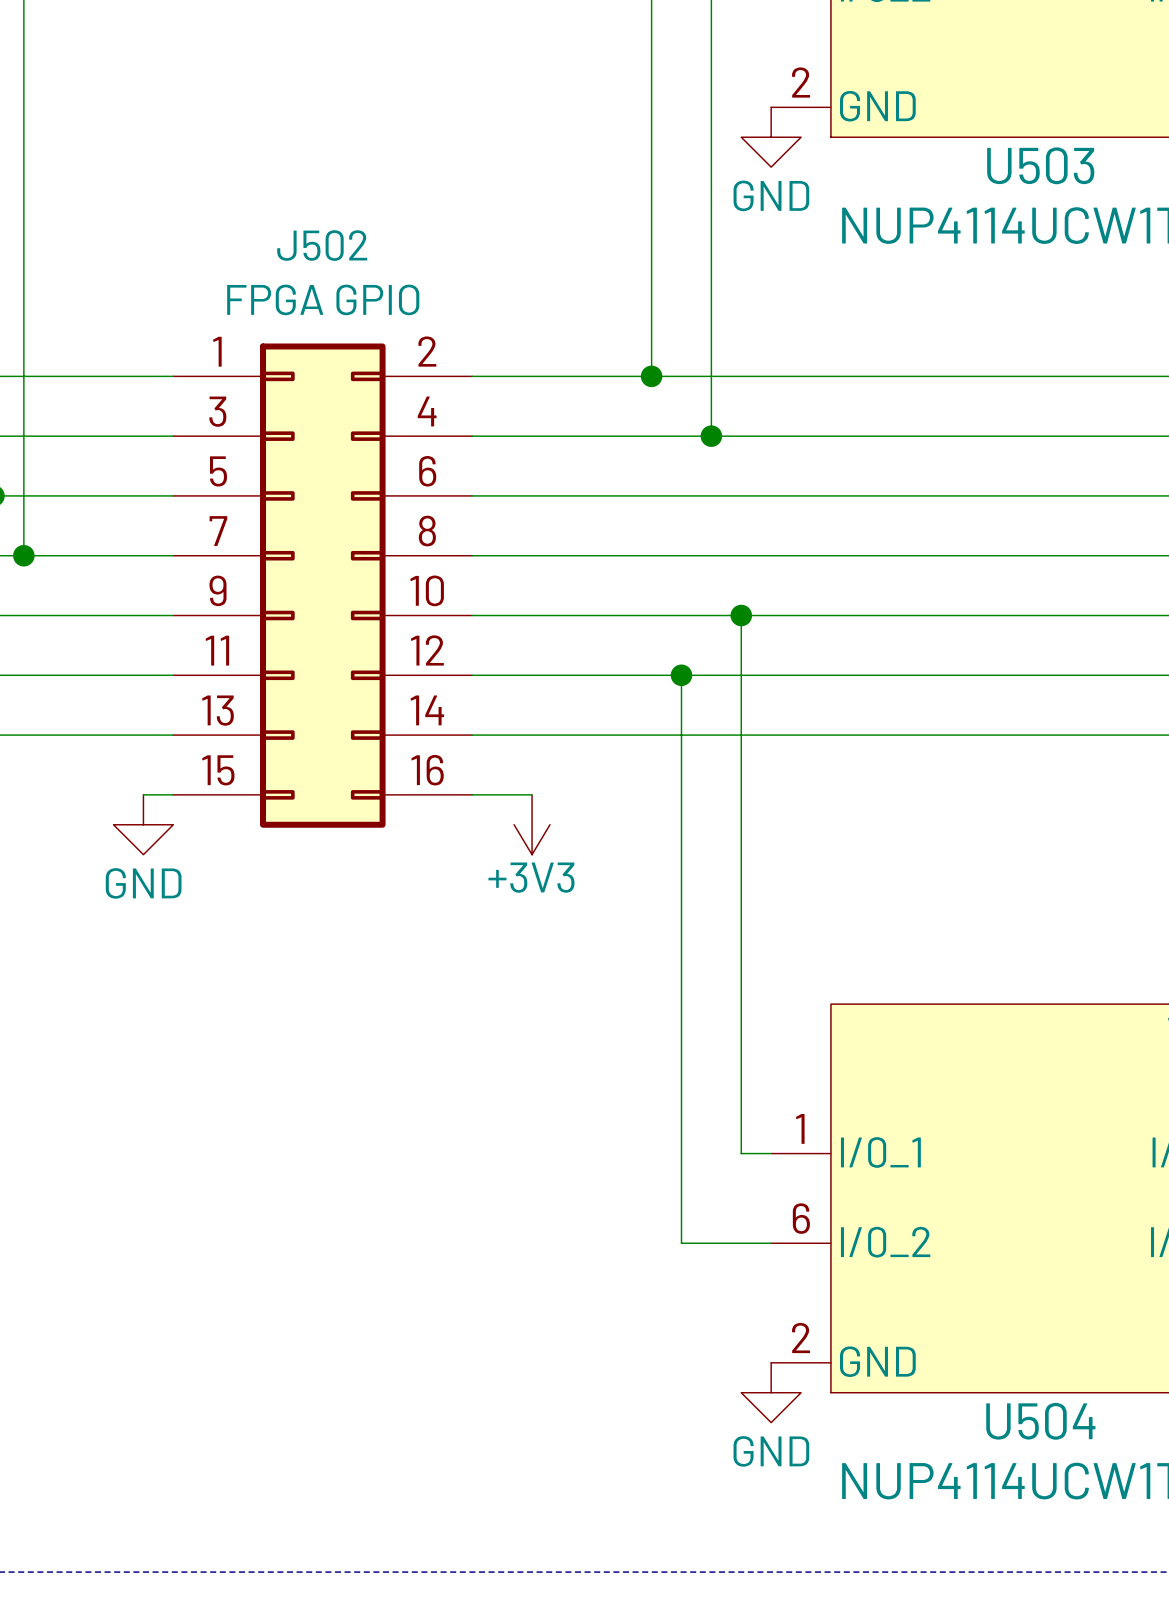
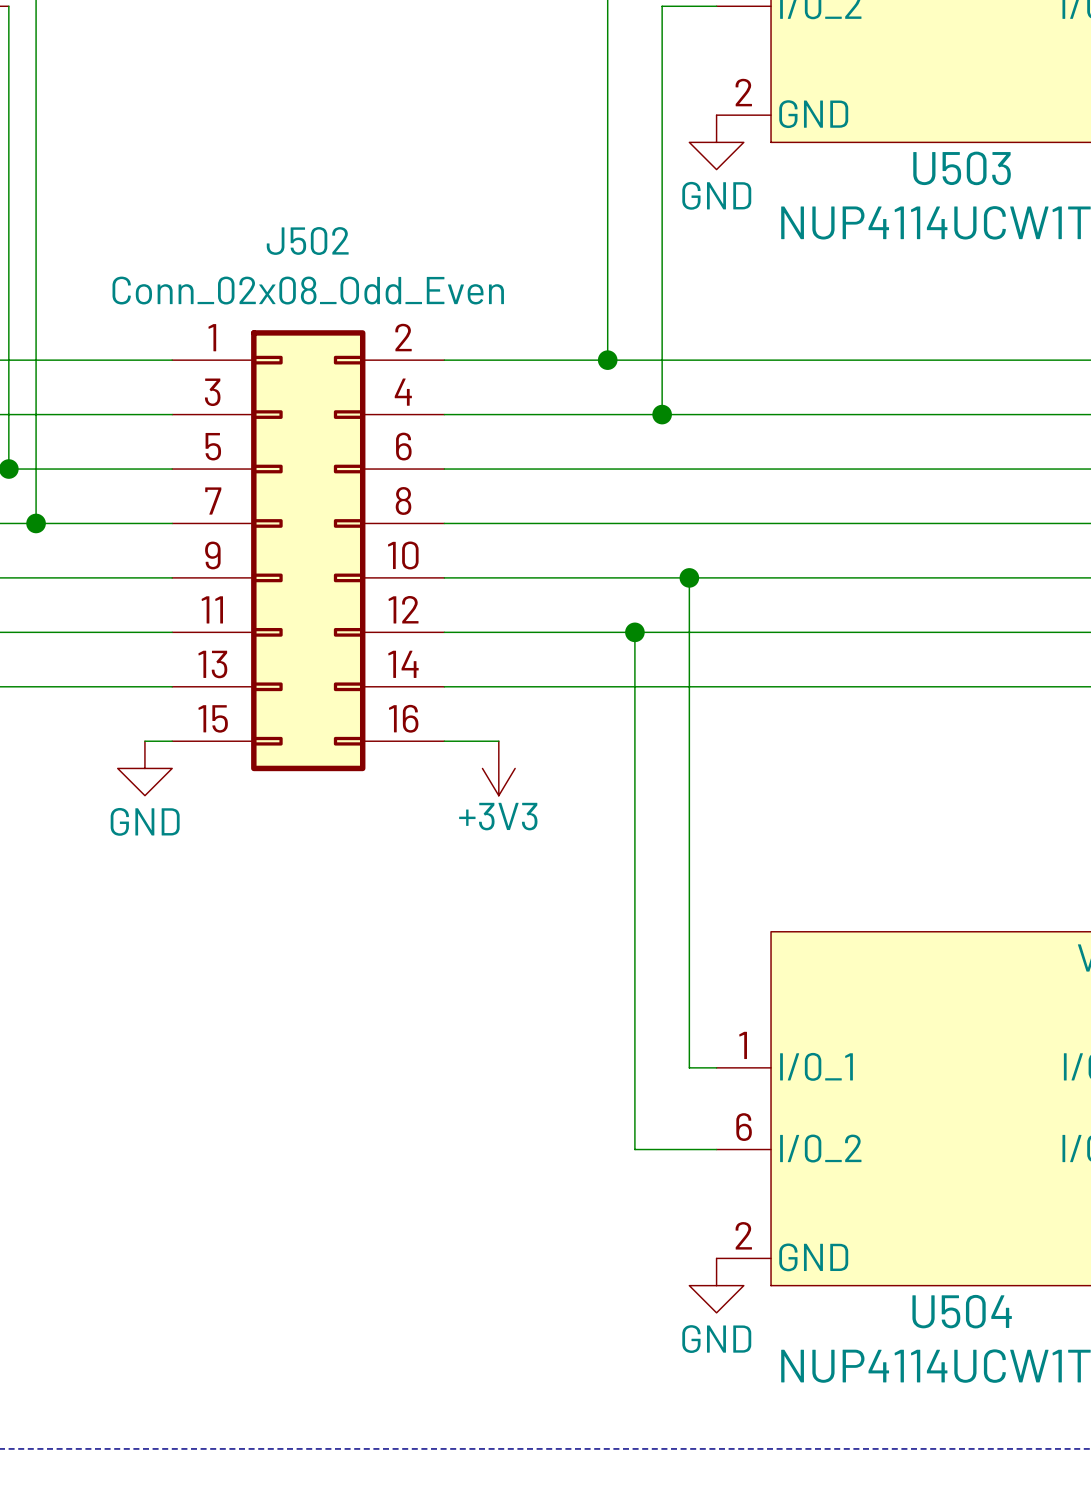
J502 value: FPGA GPIO (323, 299) -> Conn_02x08_Odd_Even (308, 290)

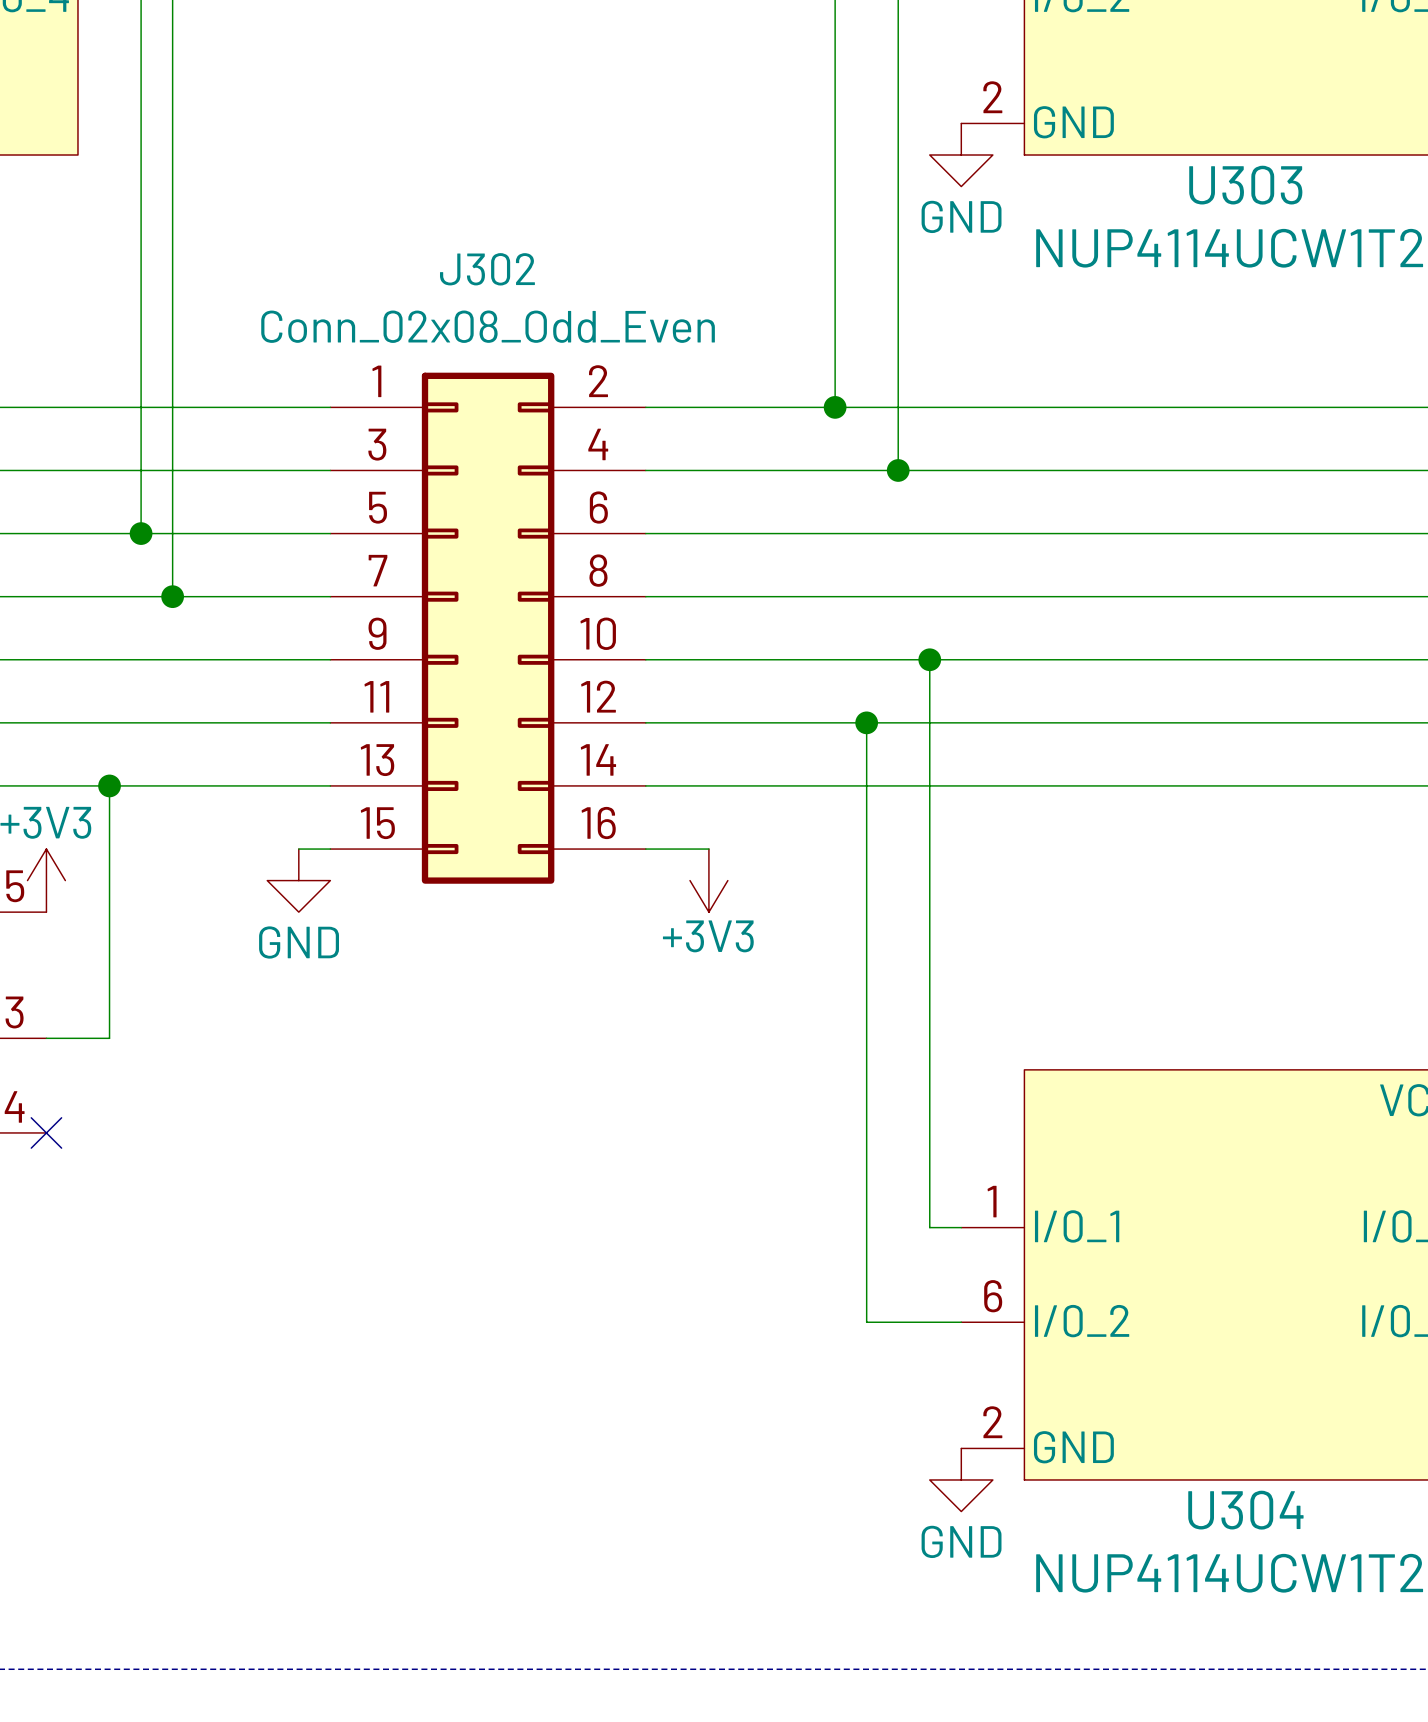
U503 name: U503 (962, 168) -> U303 (1245, 185)
J502 name: J502 (307, 241) -> J302 (487, 269)
U504 name: U504 (962, 1311) -> U304 (1245, 1510)

